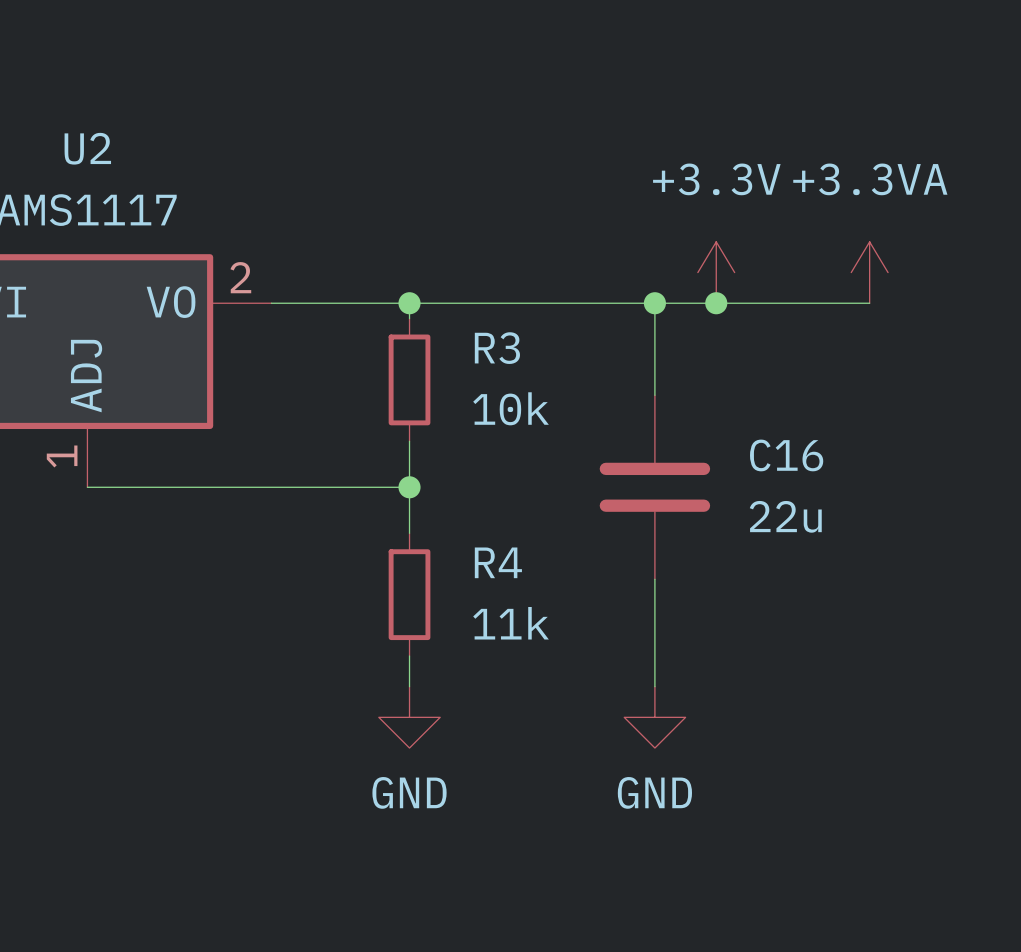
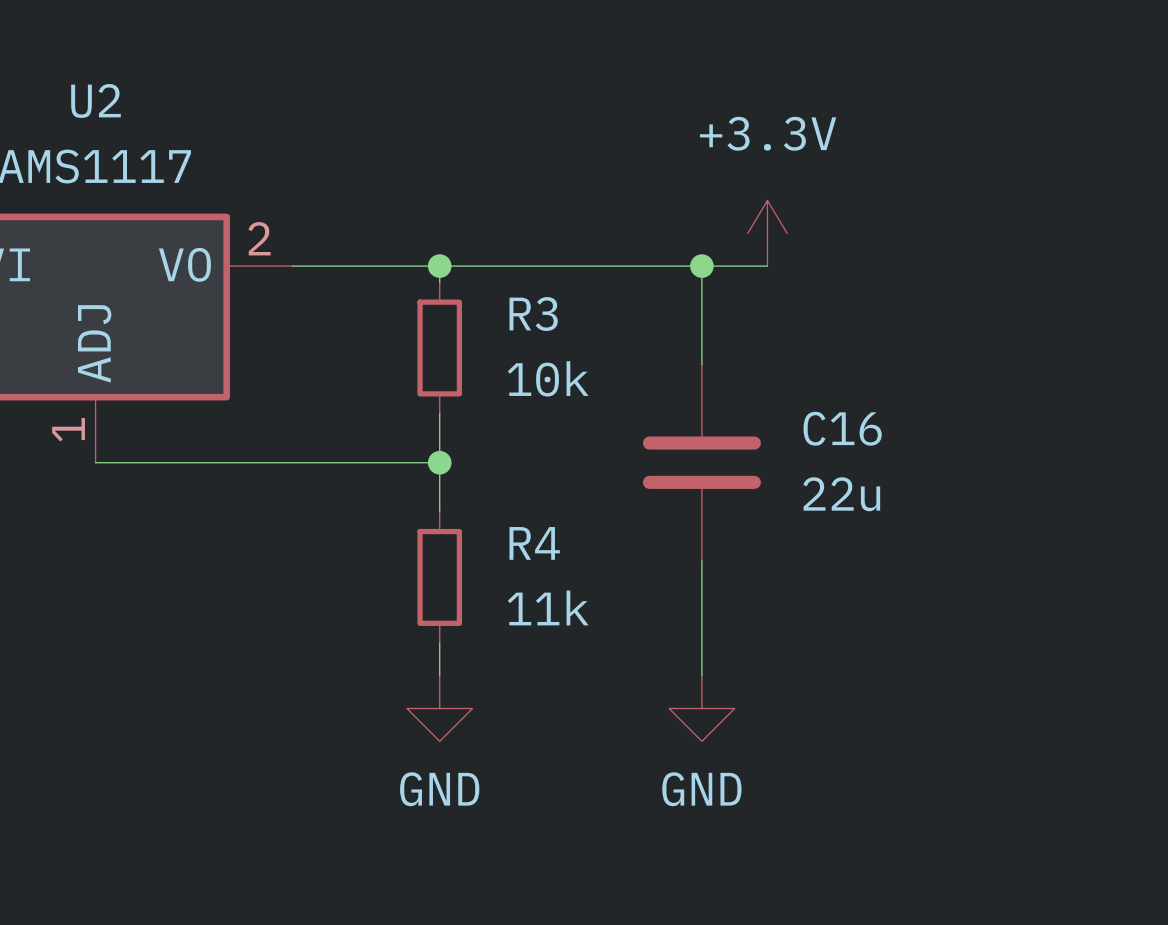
power symbol: +3.3VA (869, 272) -> none
wire: (716, 303) (869, 303) -> none
junction: (716, 303) -> none

